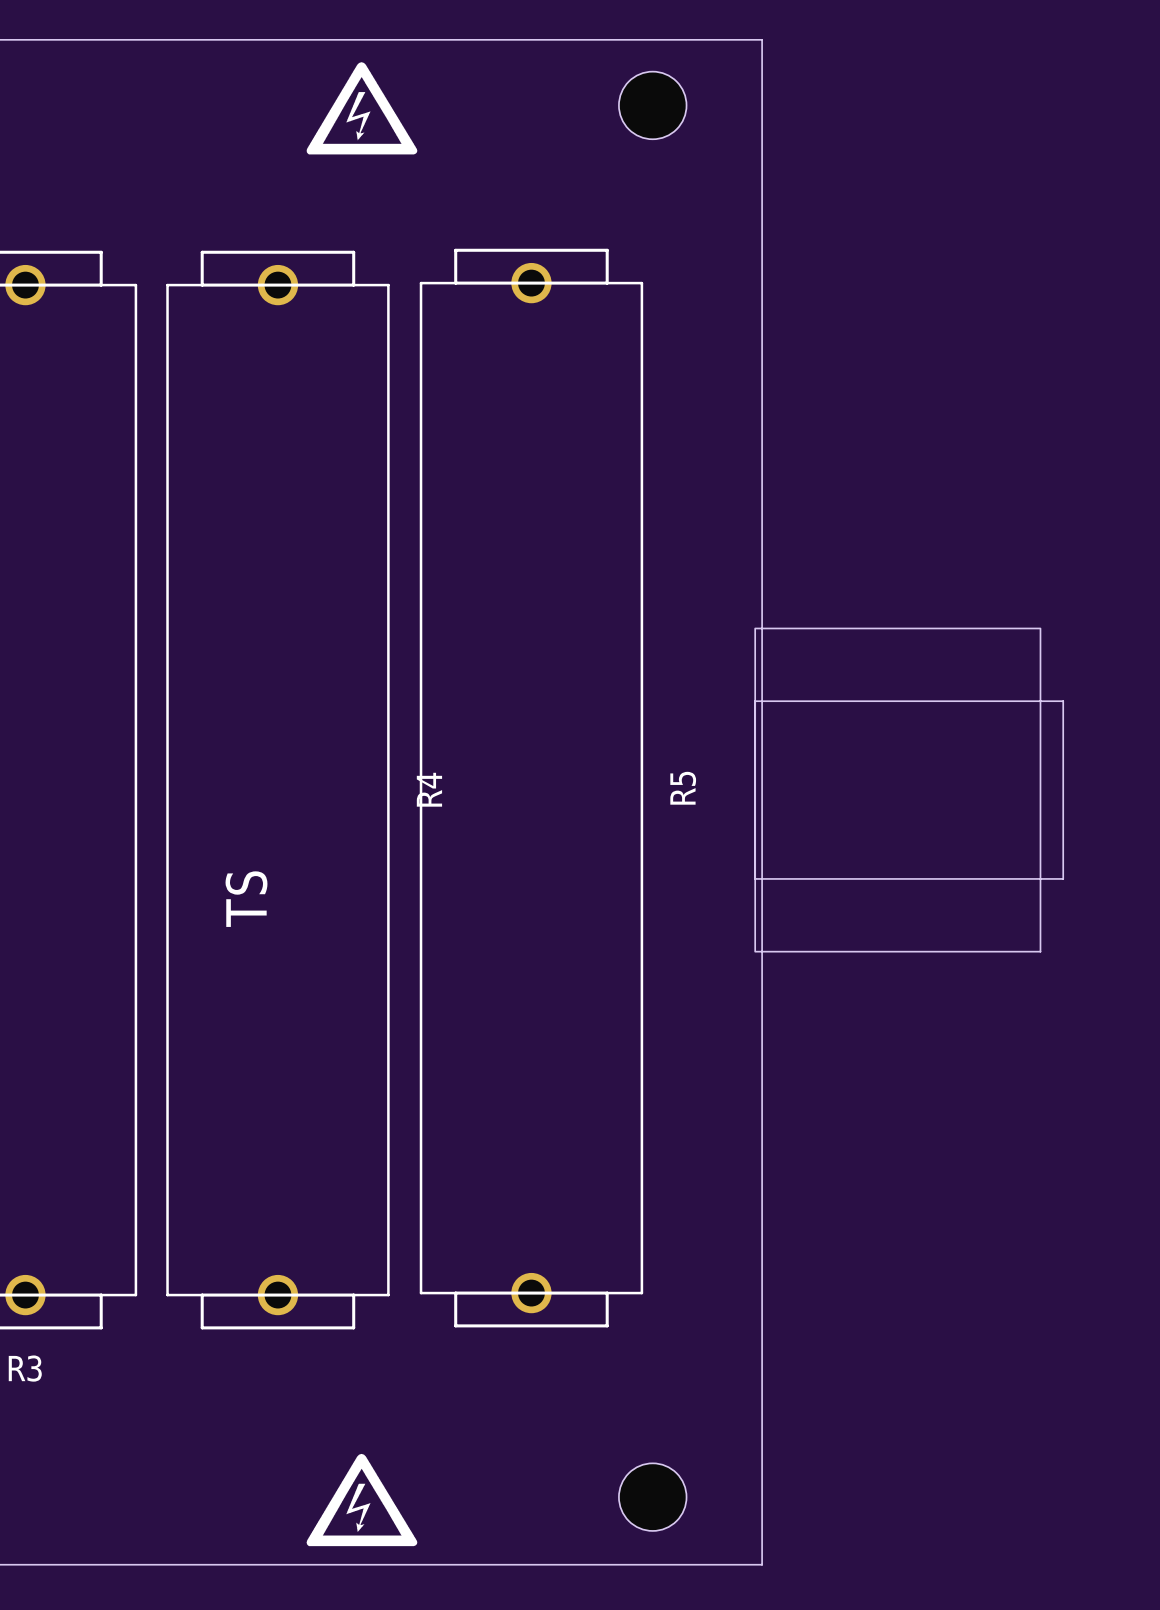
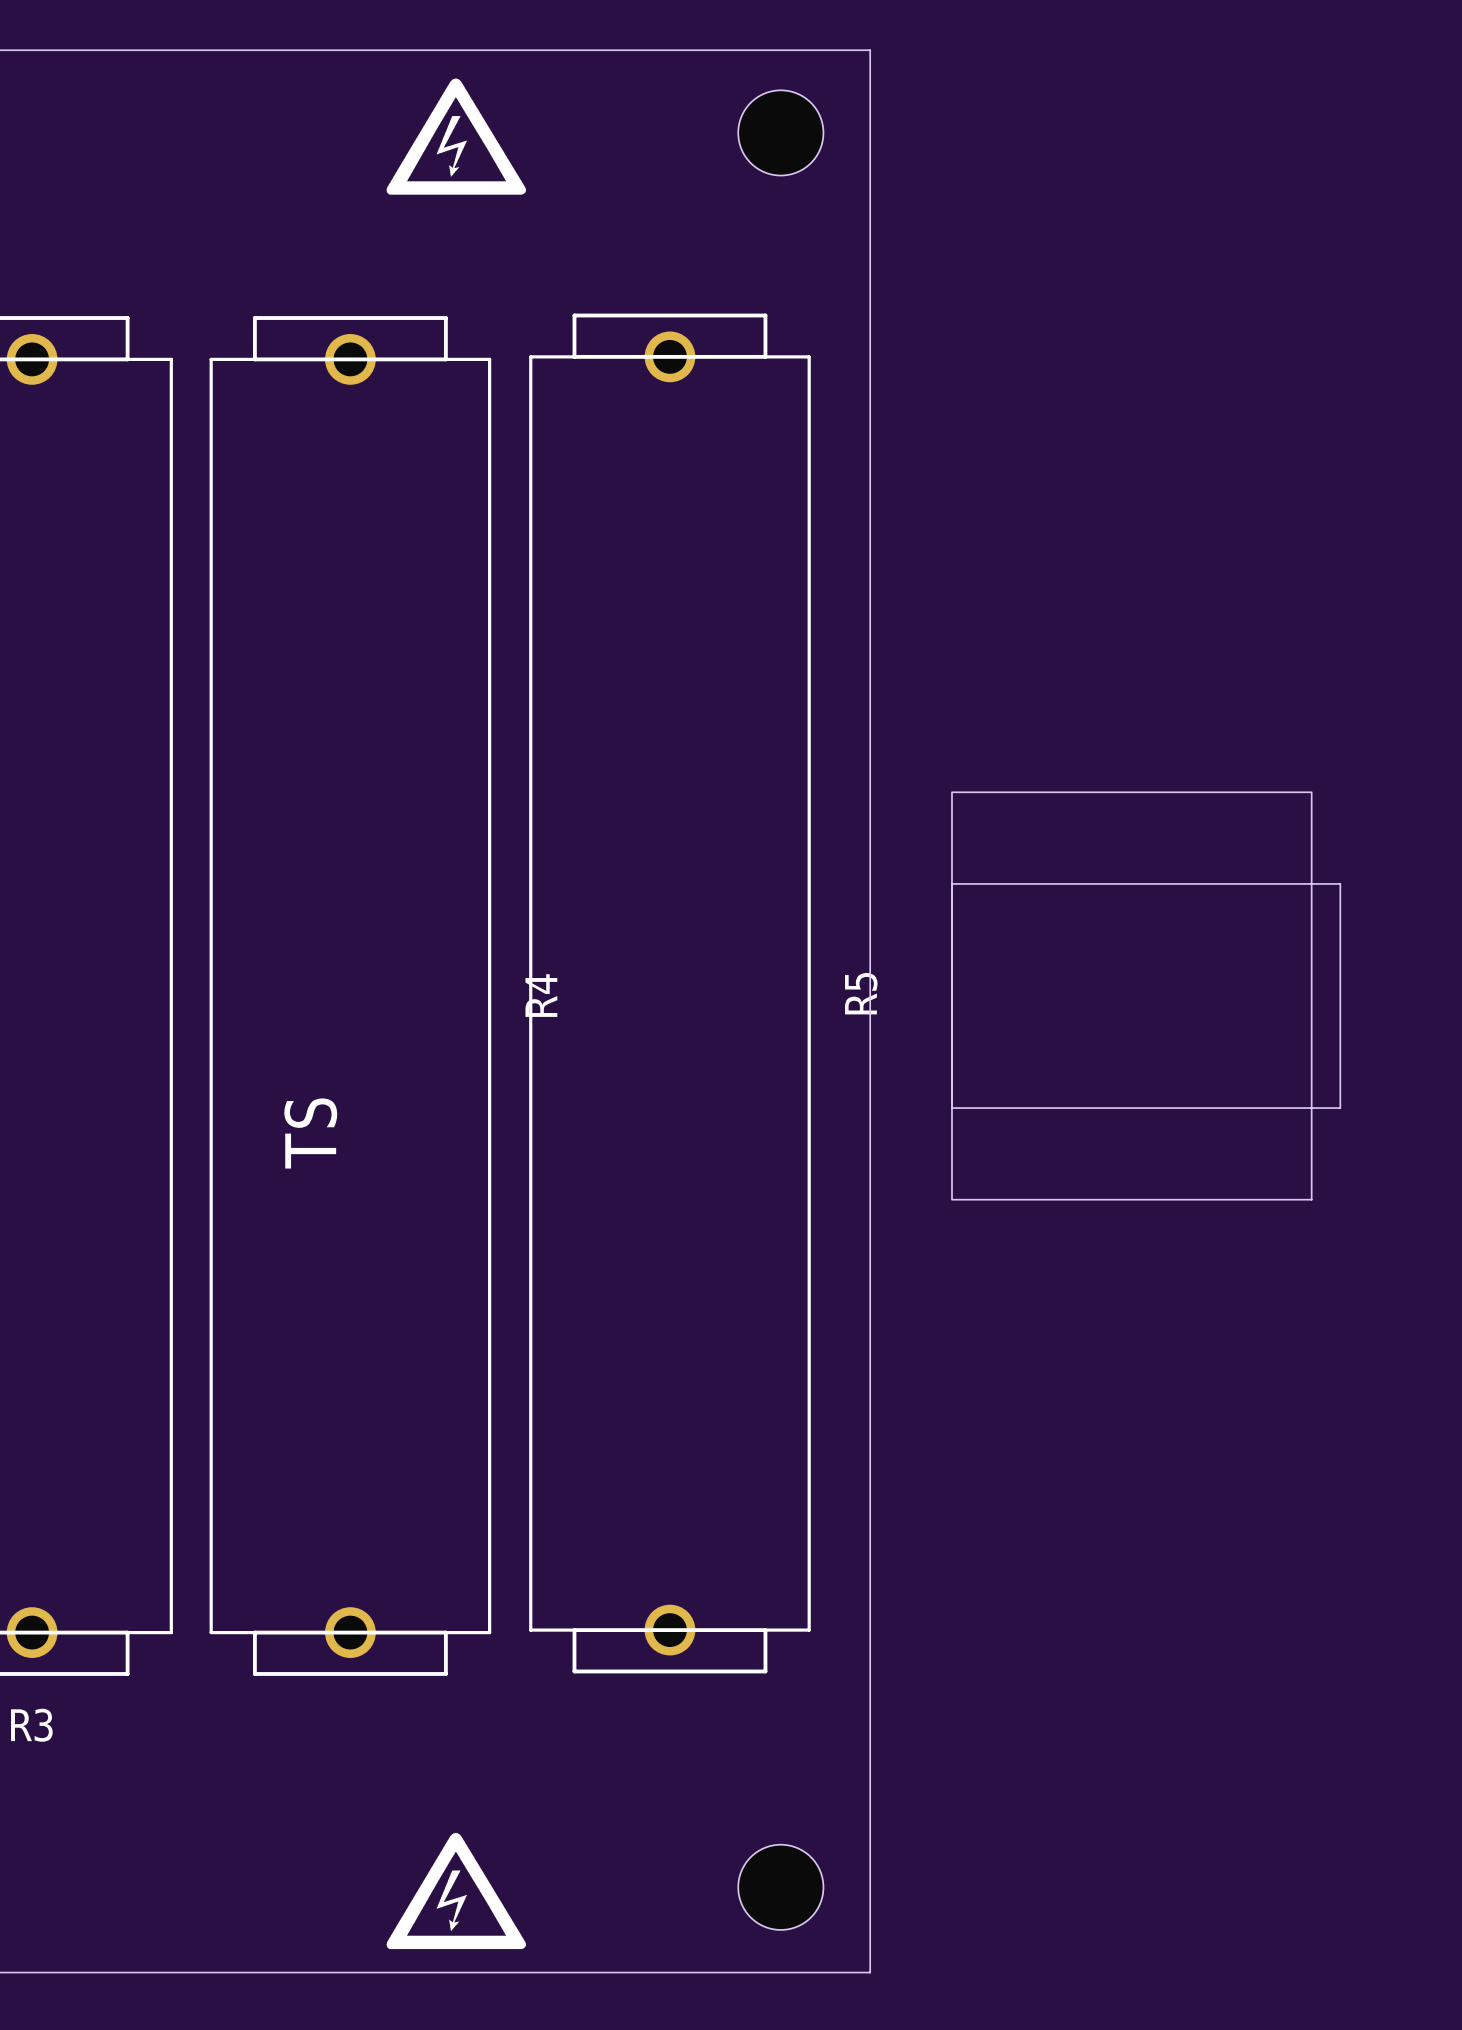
board edge: (690, 39) (762, 39) (762, 1564) (690, 1564) -> (870, 50) (870, 1972)
part position: (652, 105) -> (780, 132)
part position: (652, 1497) -> (780, 1887)

